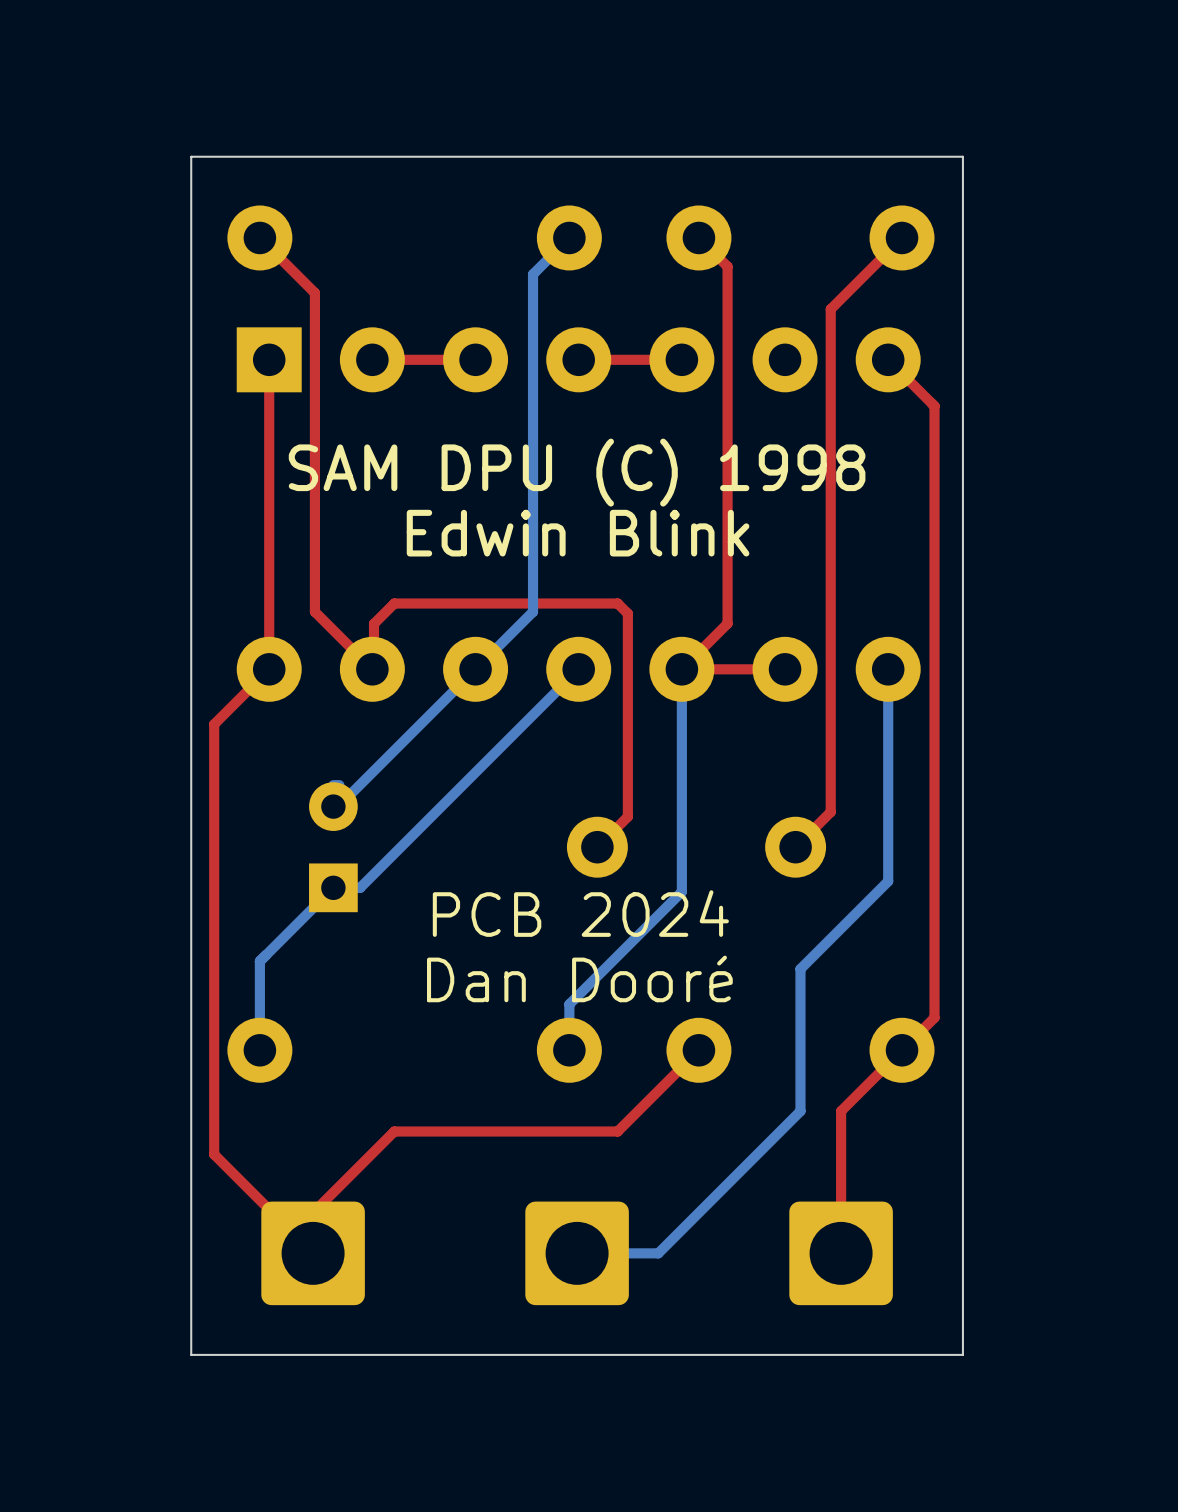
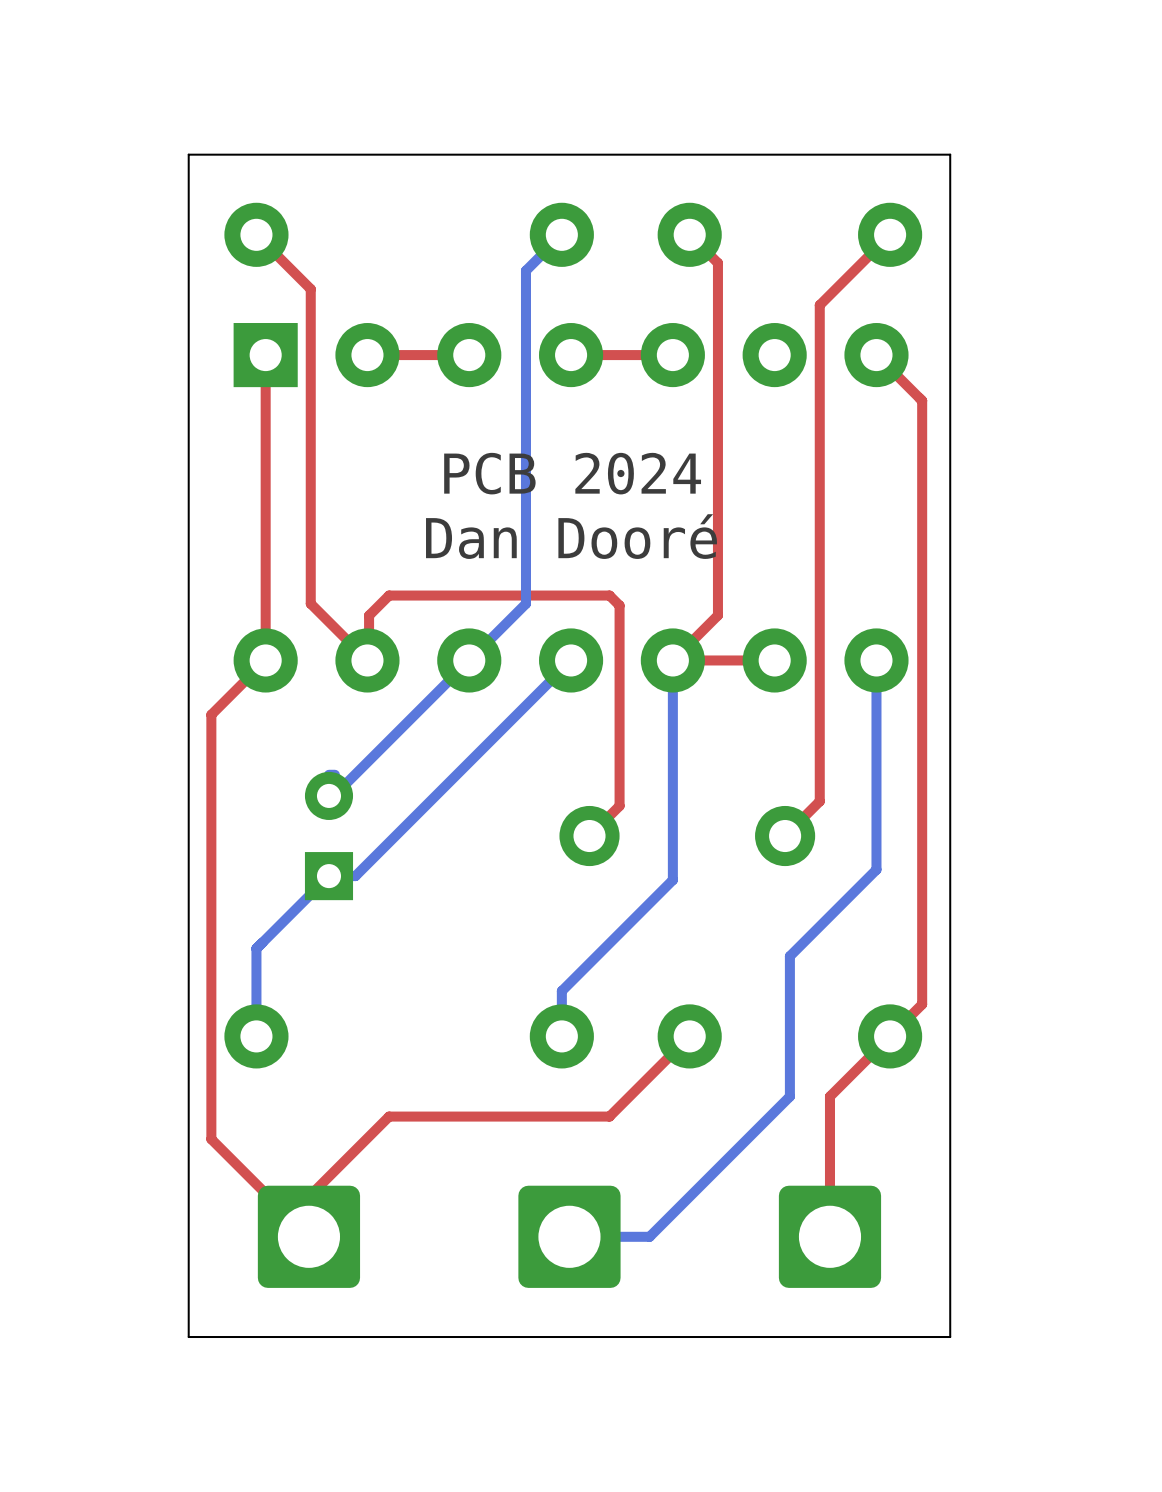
text: SAM DPU (C) 1998 (577, 472) -> none
text: Edwin Blink (578, 533) -> none
text position: PCB 2024 (580, 913) -> PCB 2024 (572, 473)
text position: Dan Dooré (579, 978) -> Dan Dooré (571, 536)

